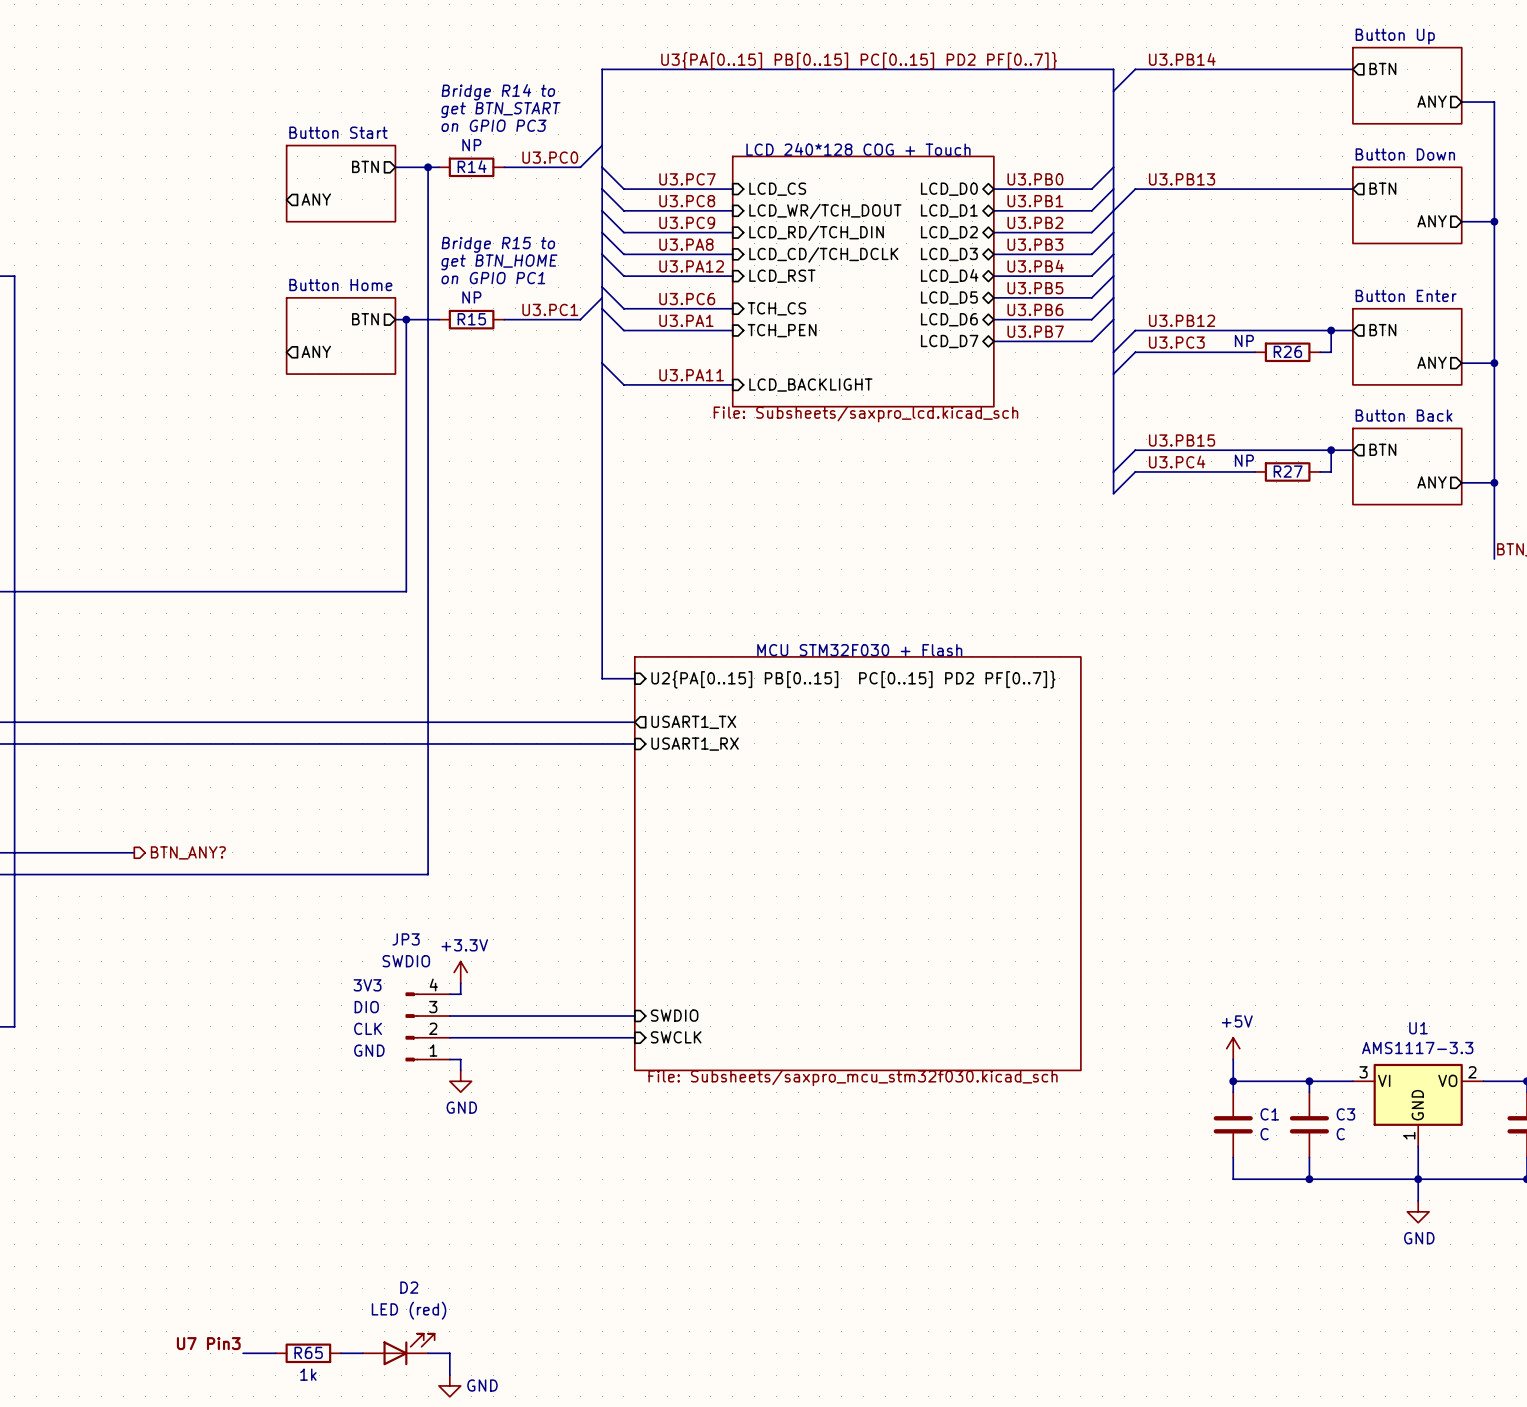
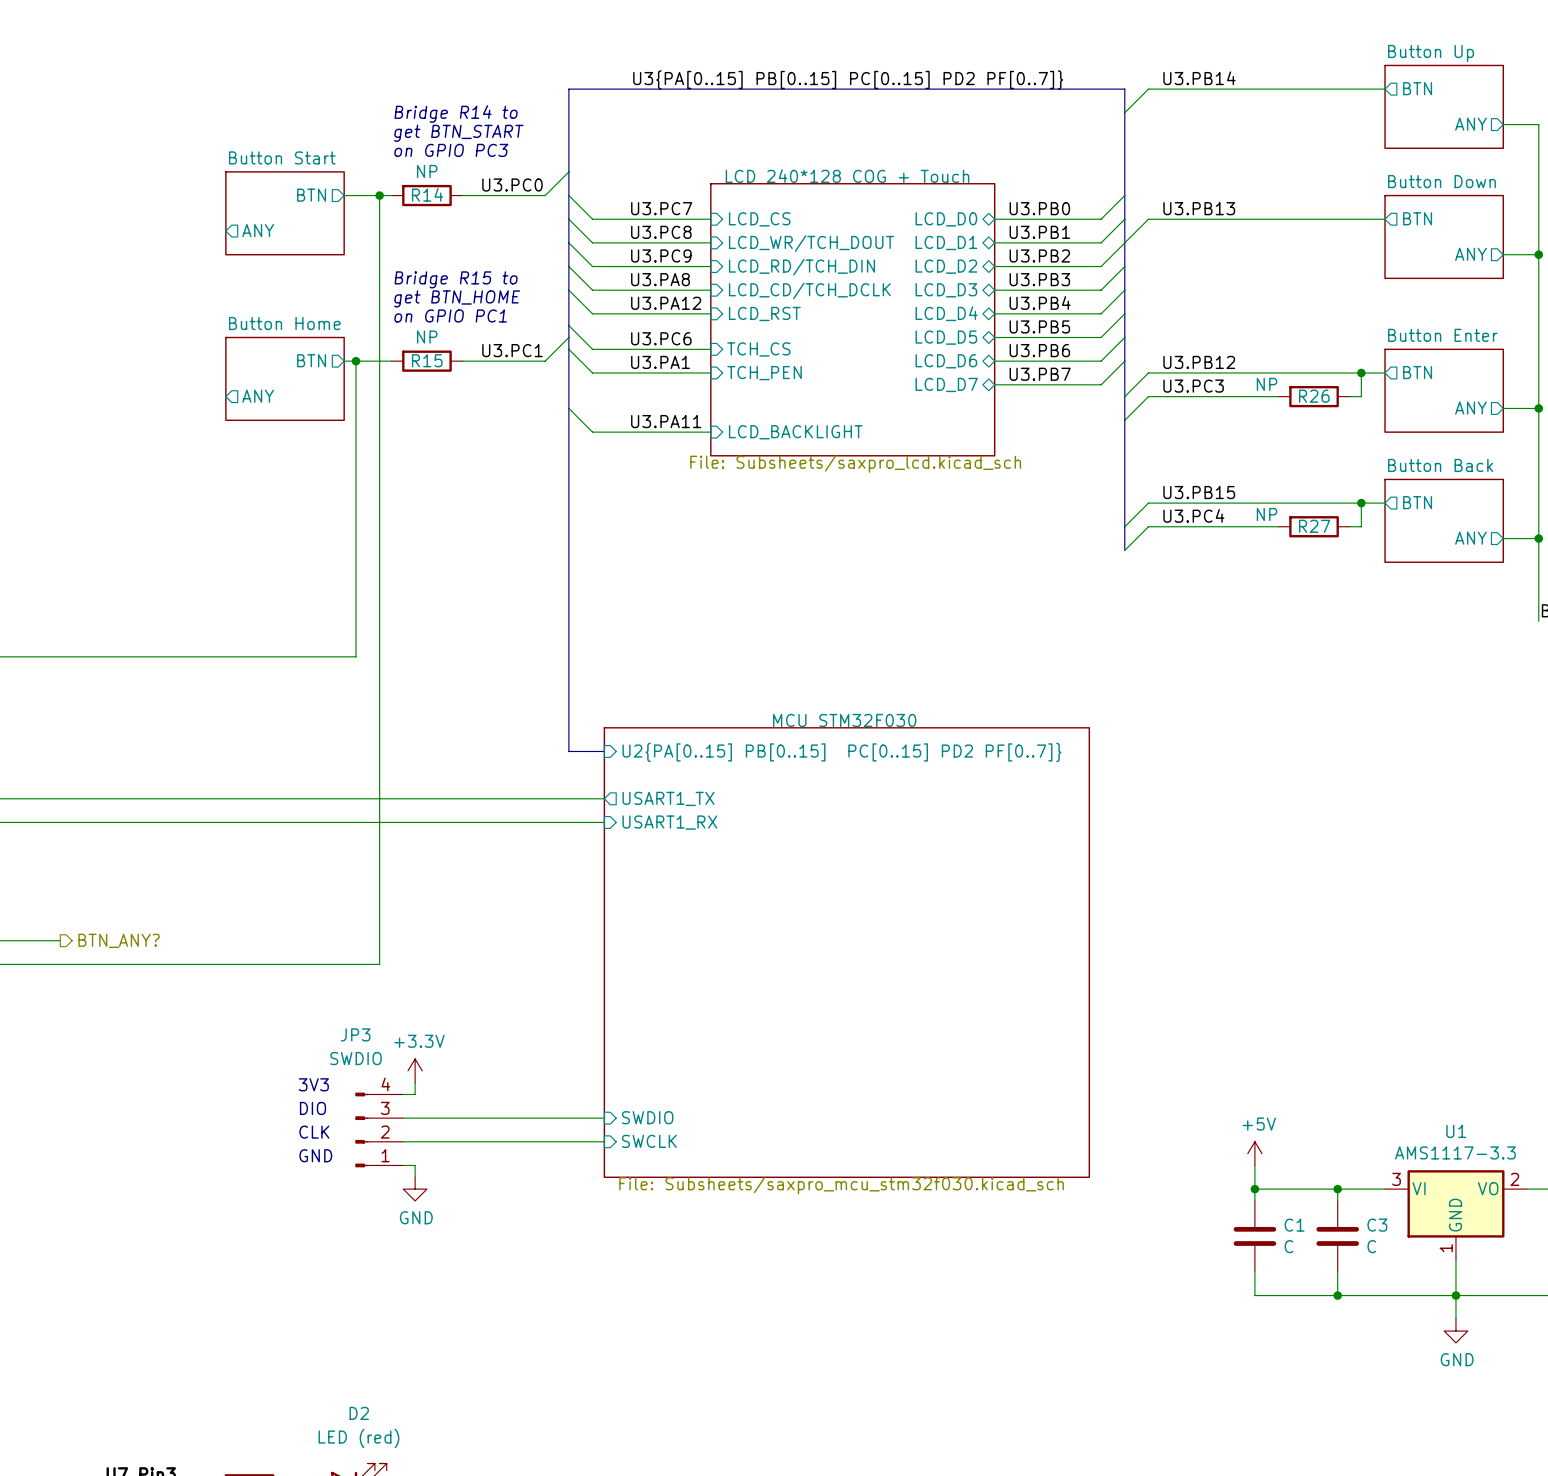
sheet MCU STM32F030 + Flash name: MCU STM32F030 + Flash (859, 650) -> MCU STM32F030 (844, 720)

